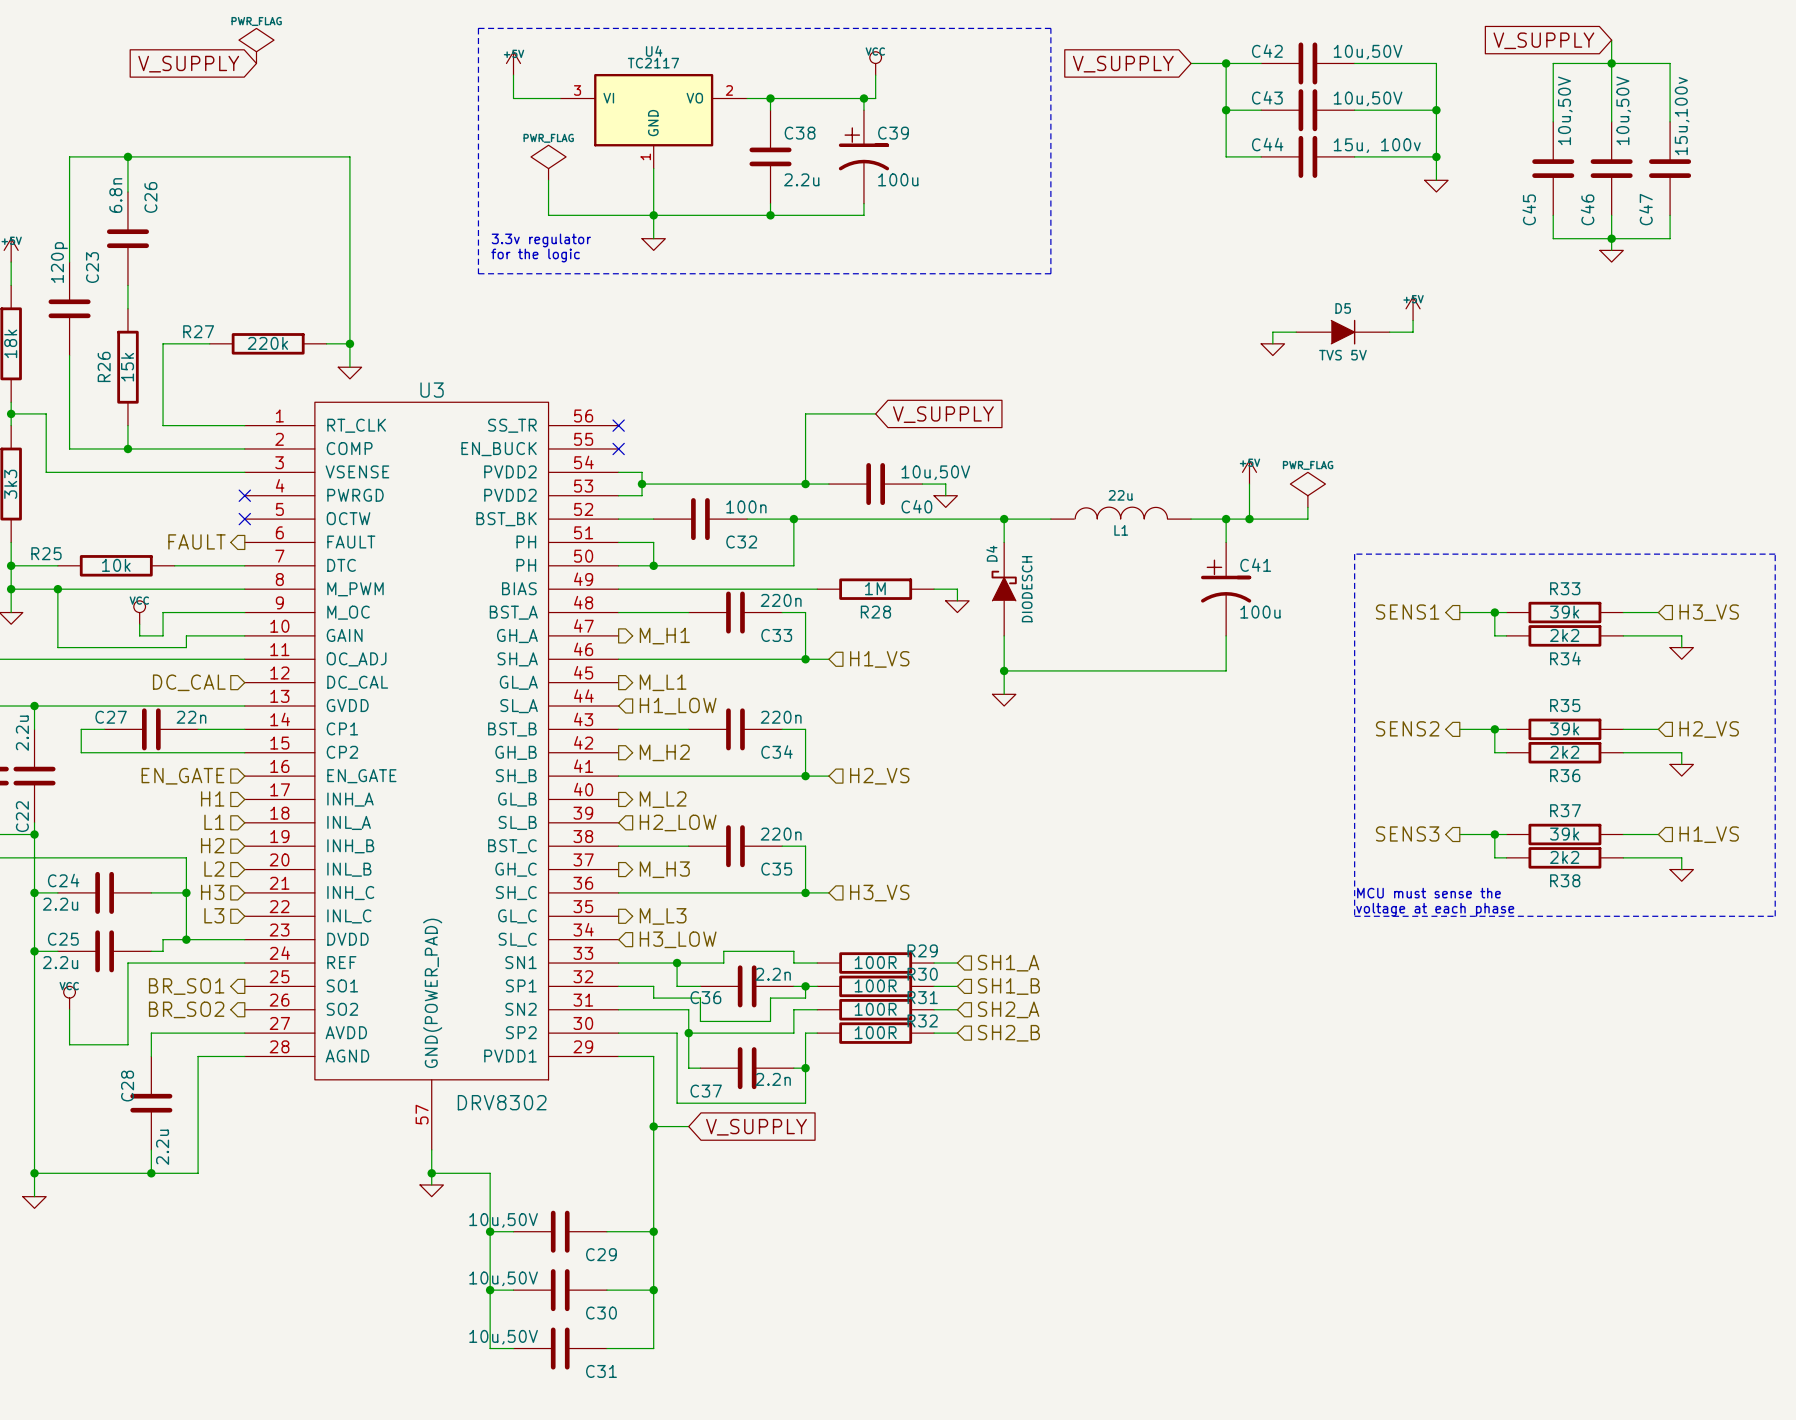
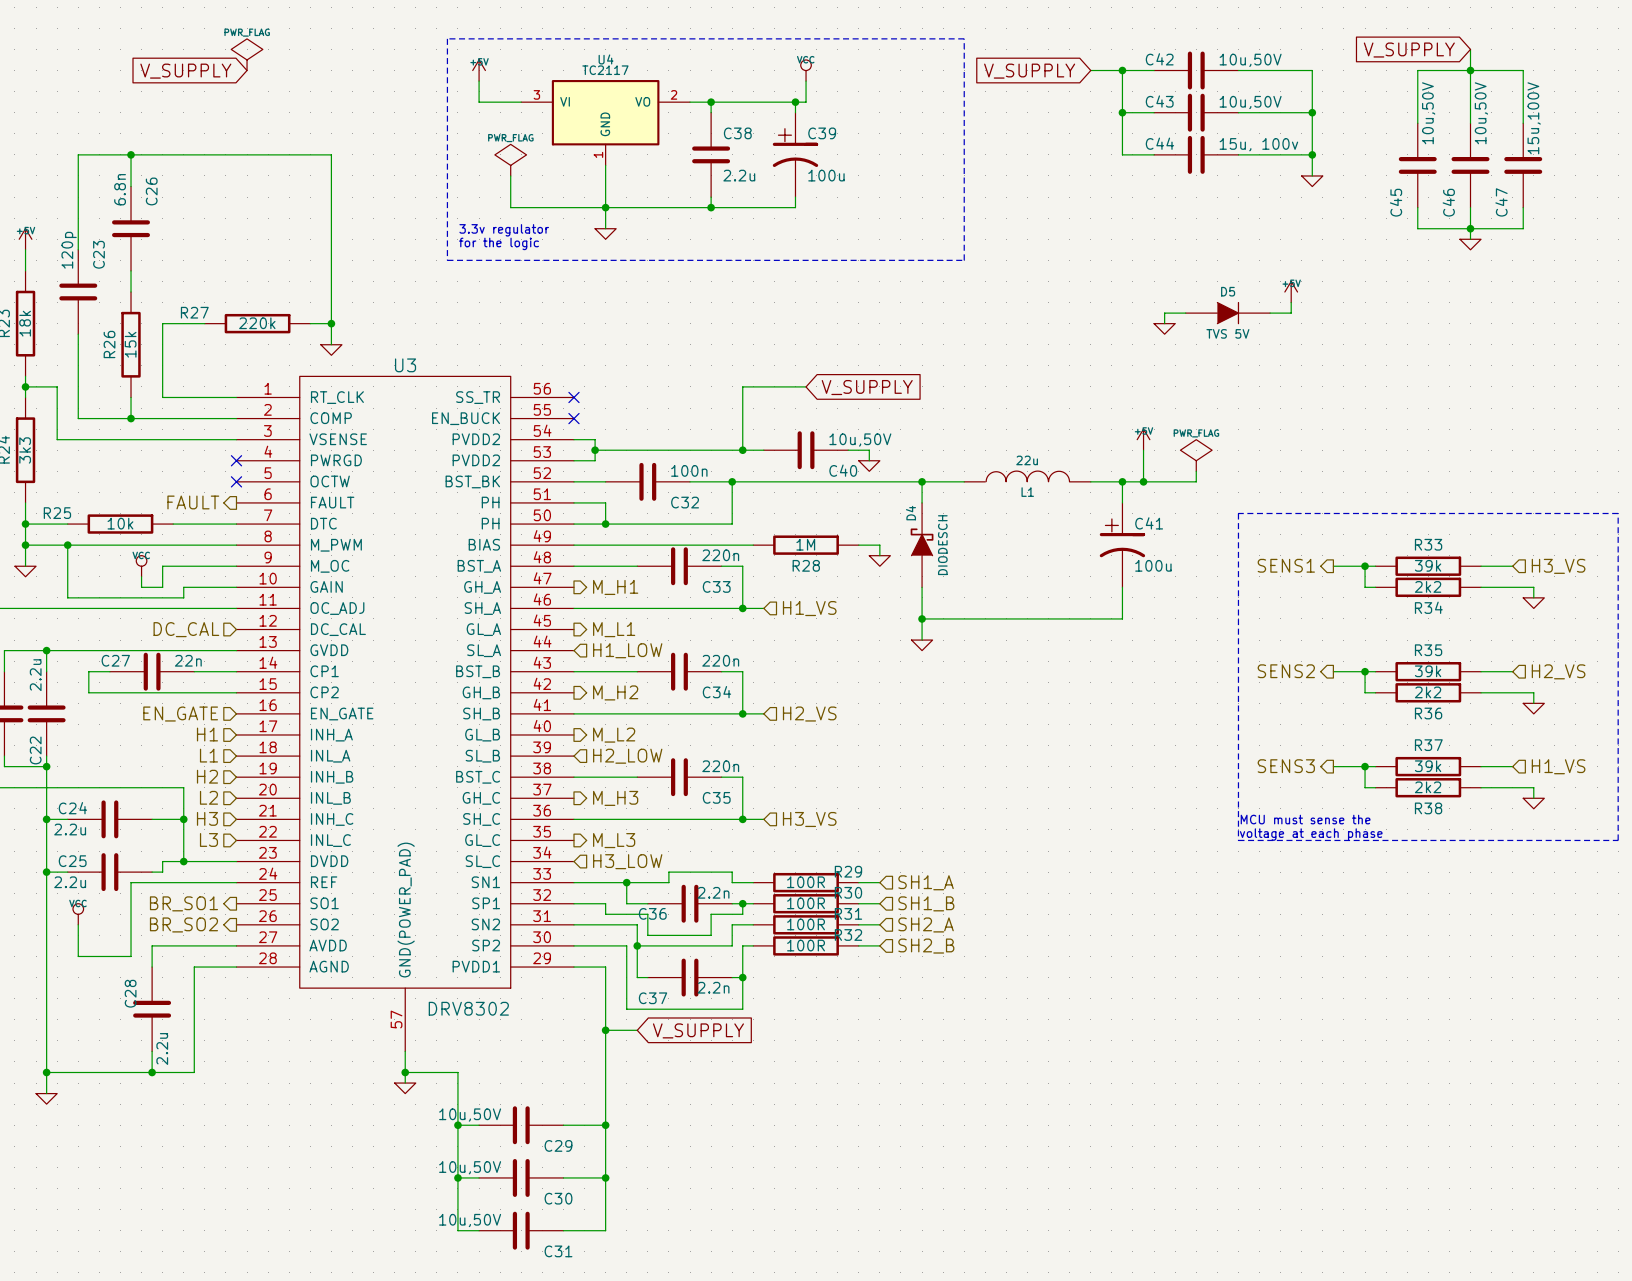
C47 value: 15u,100v (1682, 116) -> 15u,100V (1534, 118)

